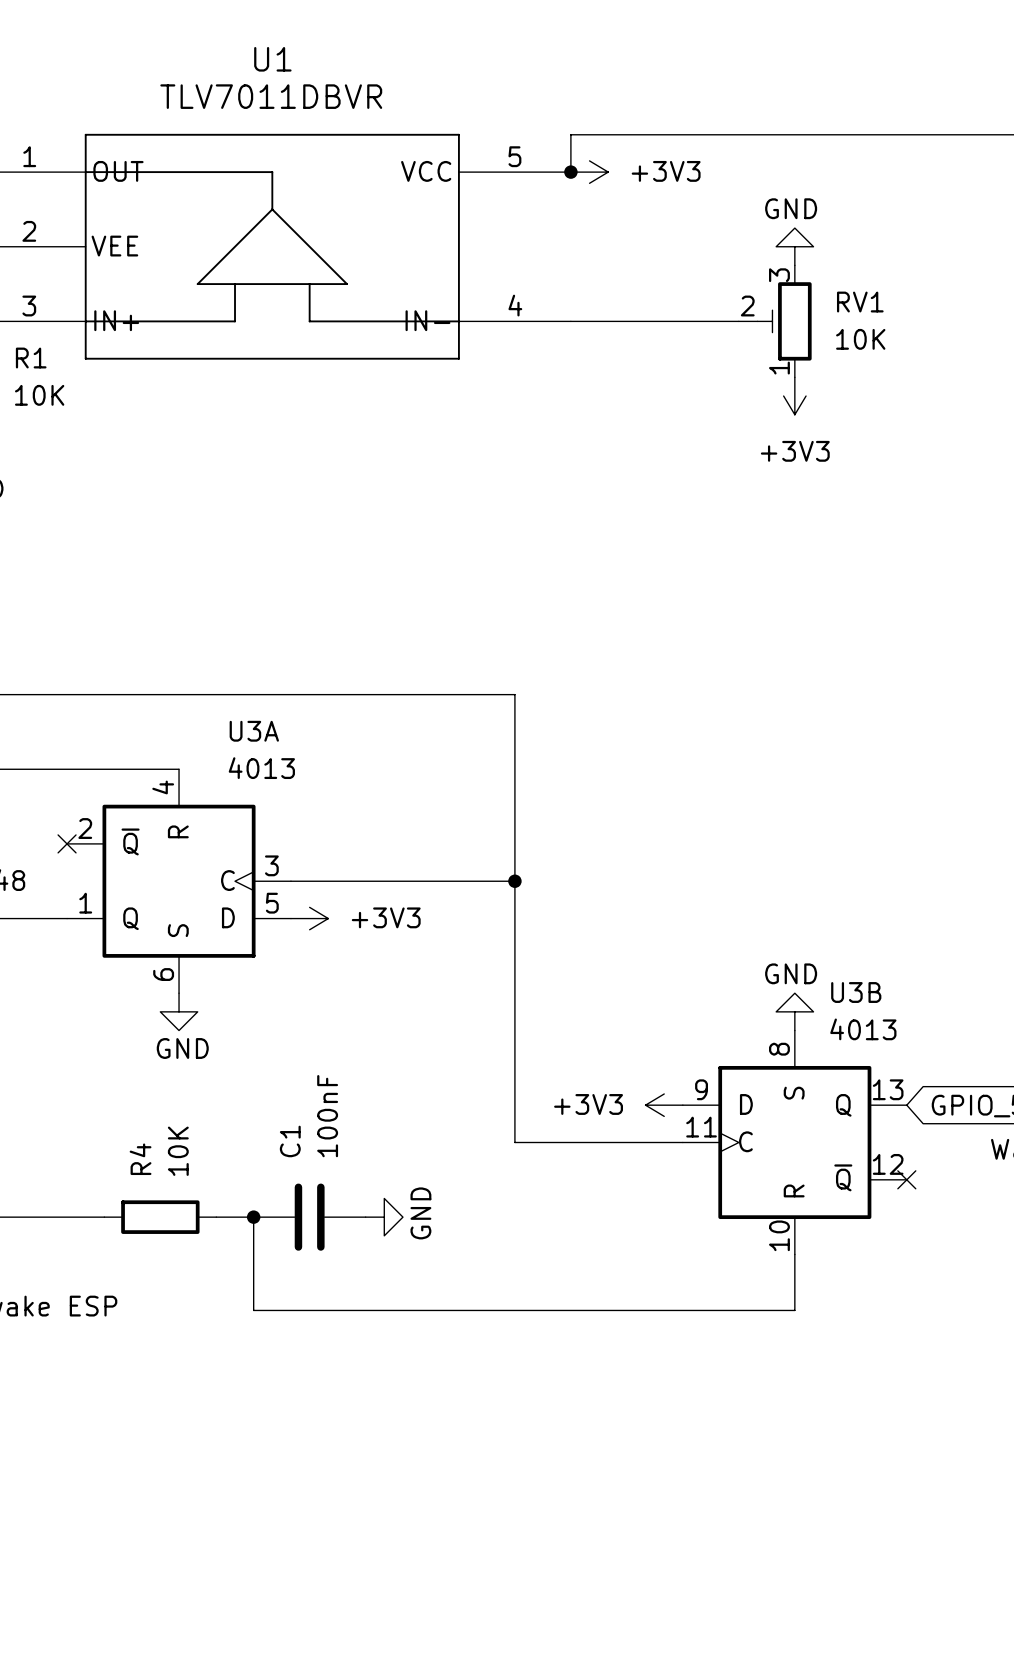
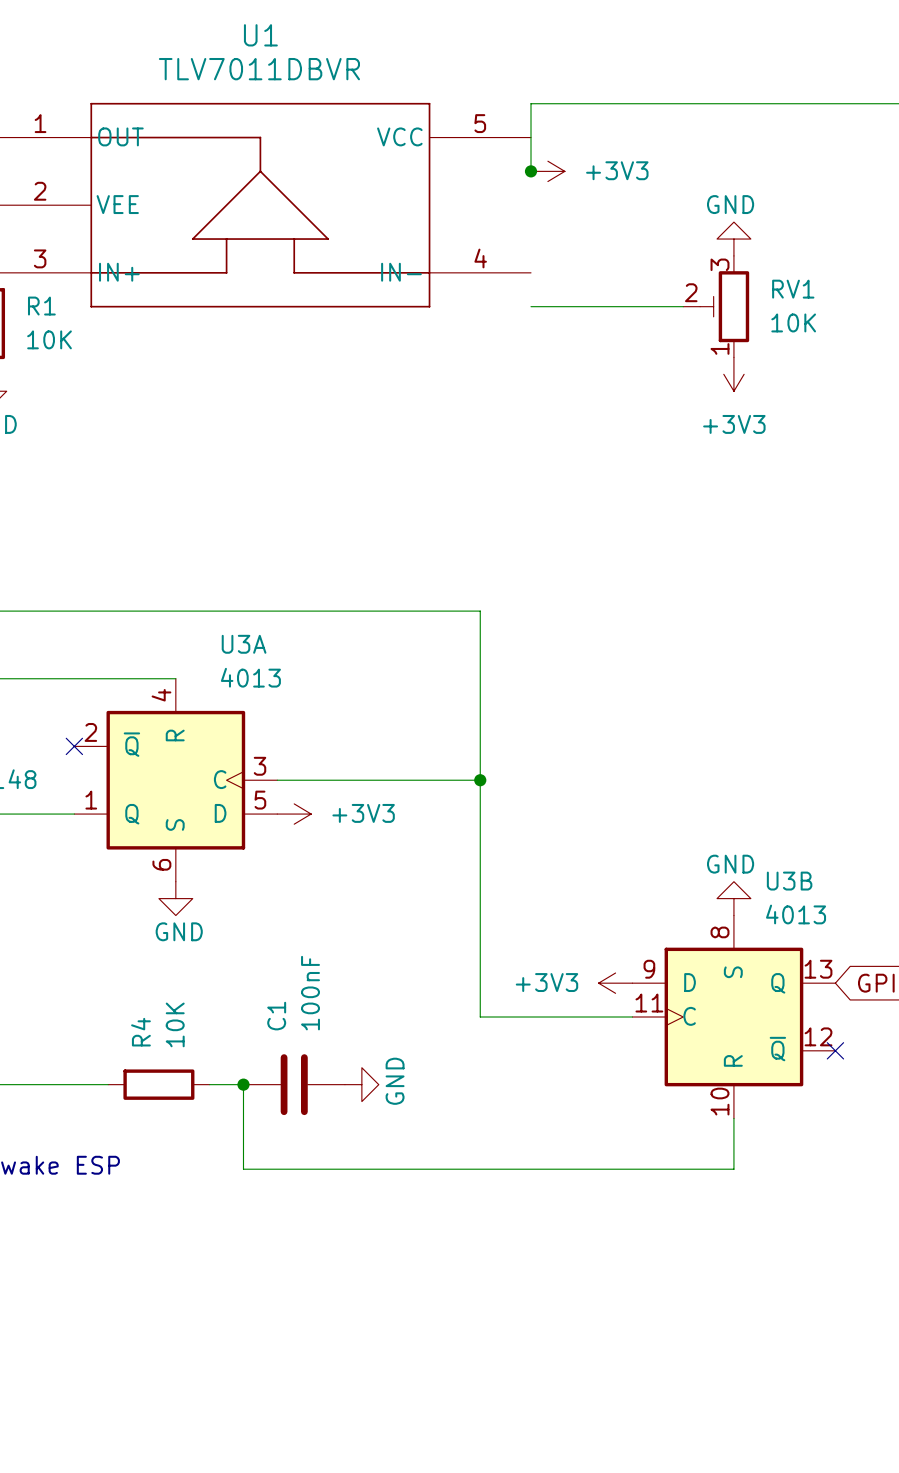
wire: none -> (531, 137) (531, 171)
junction position: (570, 172) -> (531, 171)
power symbol position: +3V3 (589, 172) -> +3V3 (547, 171)
power symbol position: GND (794, 246) -> GND (733, 239)
wire: (570, 321) (738, 321) -> (531, 306) (683, 306)
RV1 position: (775, 321) -> (716, 306)
power symbol position: +3V3 (794, 396) -> +3V3 (733, 374)

